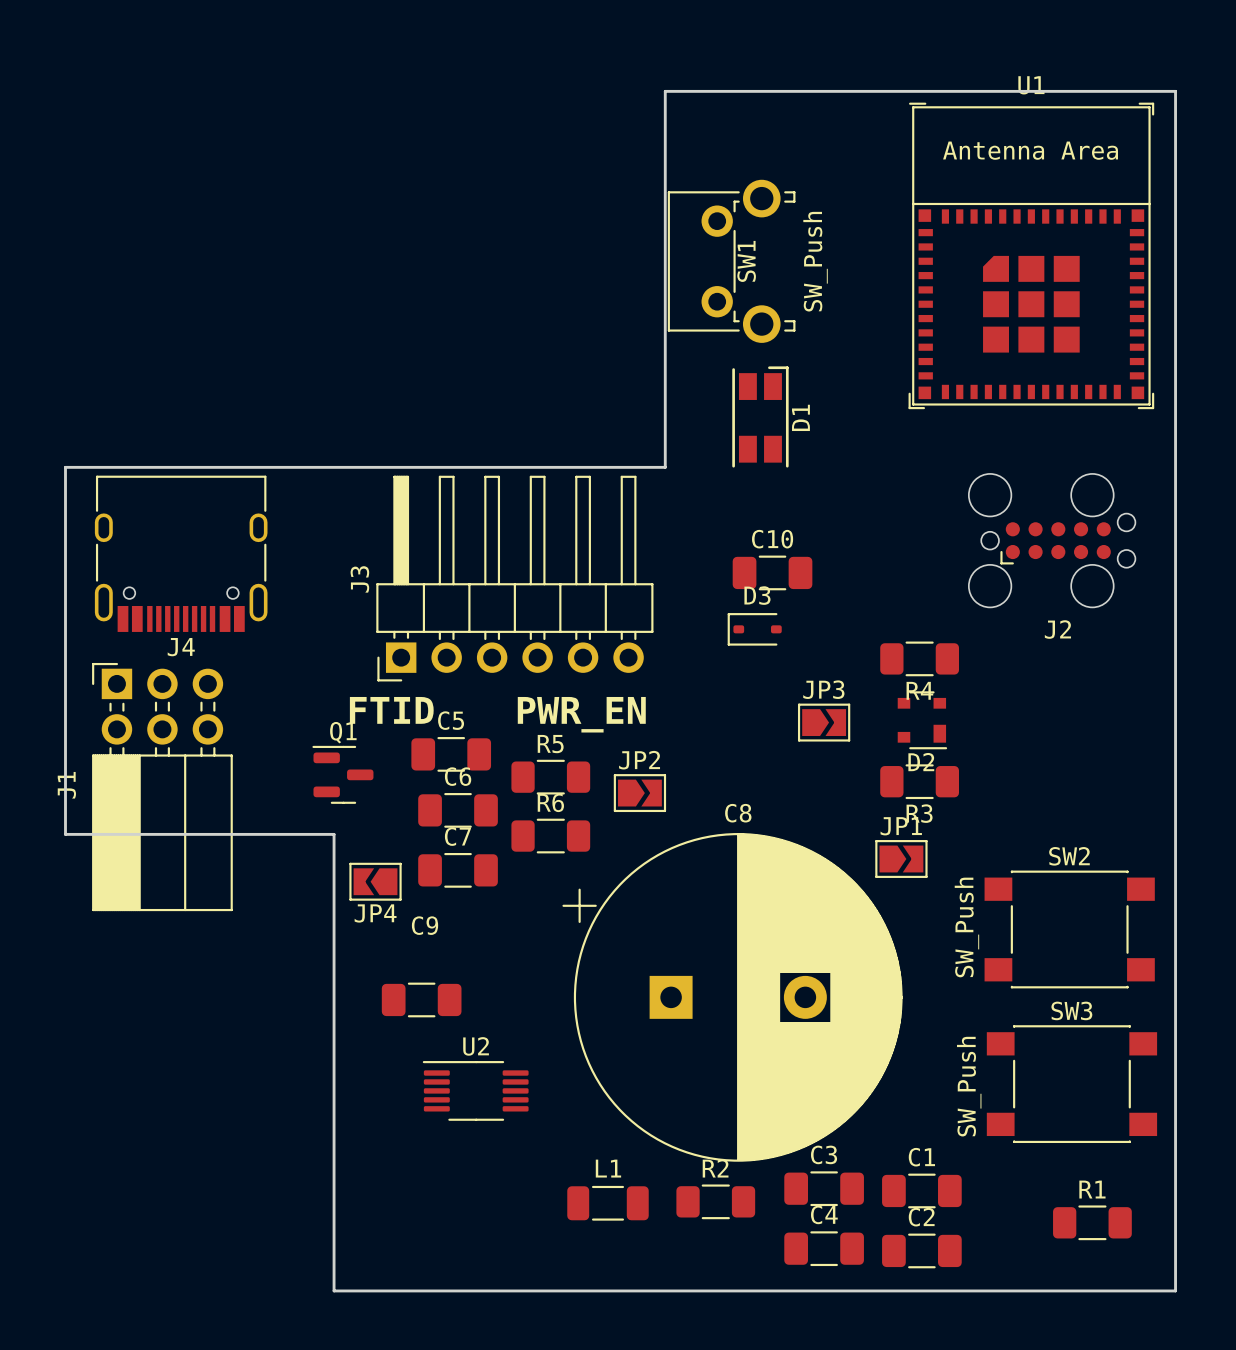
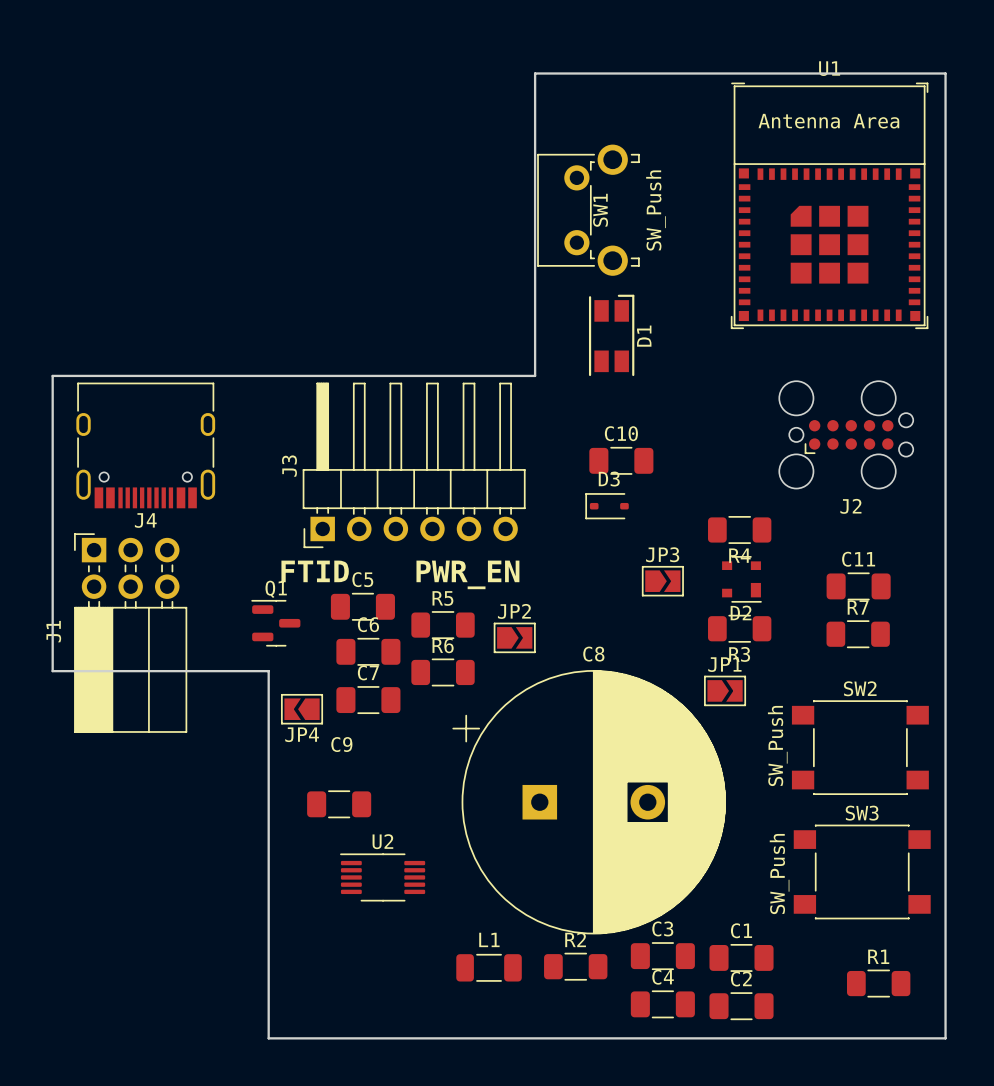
C11: none -> (858, 586)
R7: none -> (858, 634)

